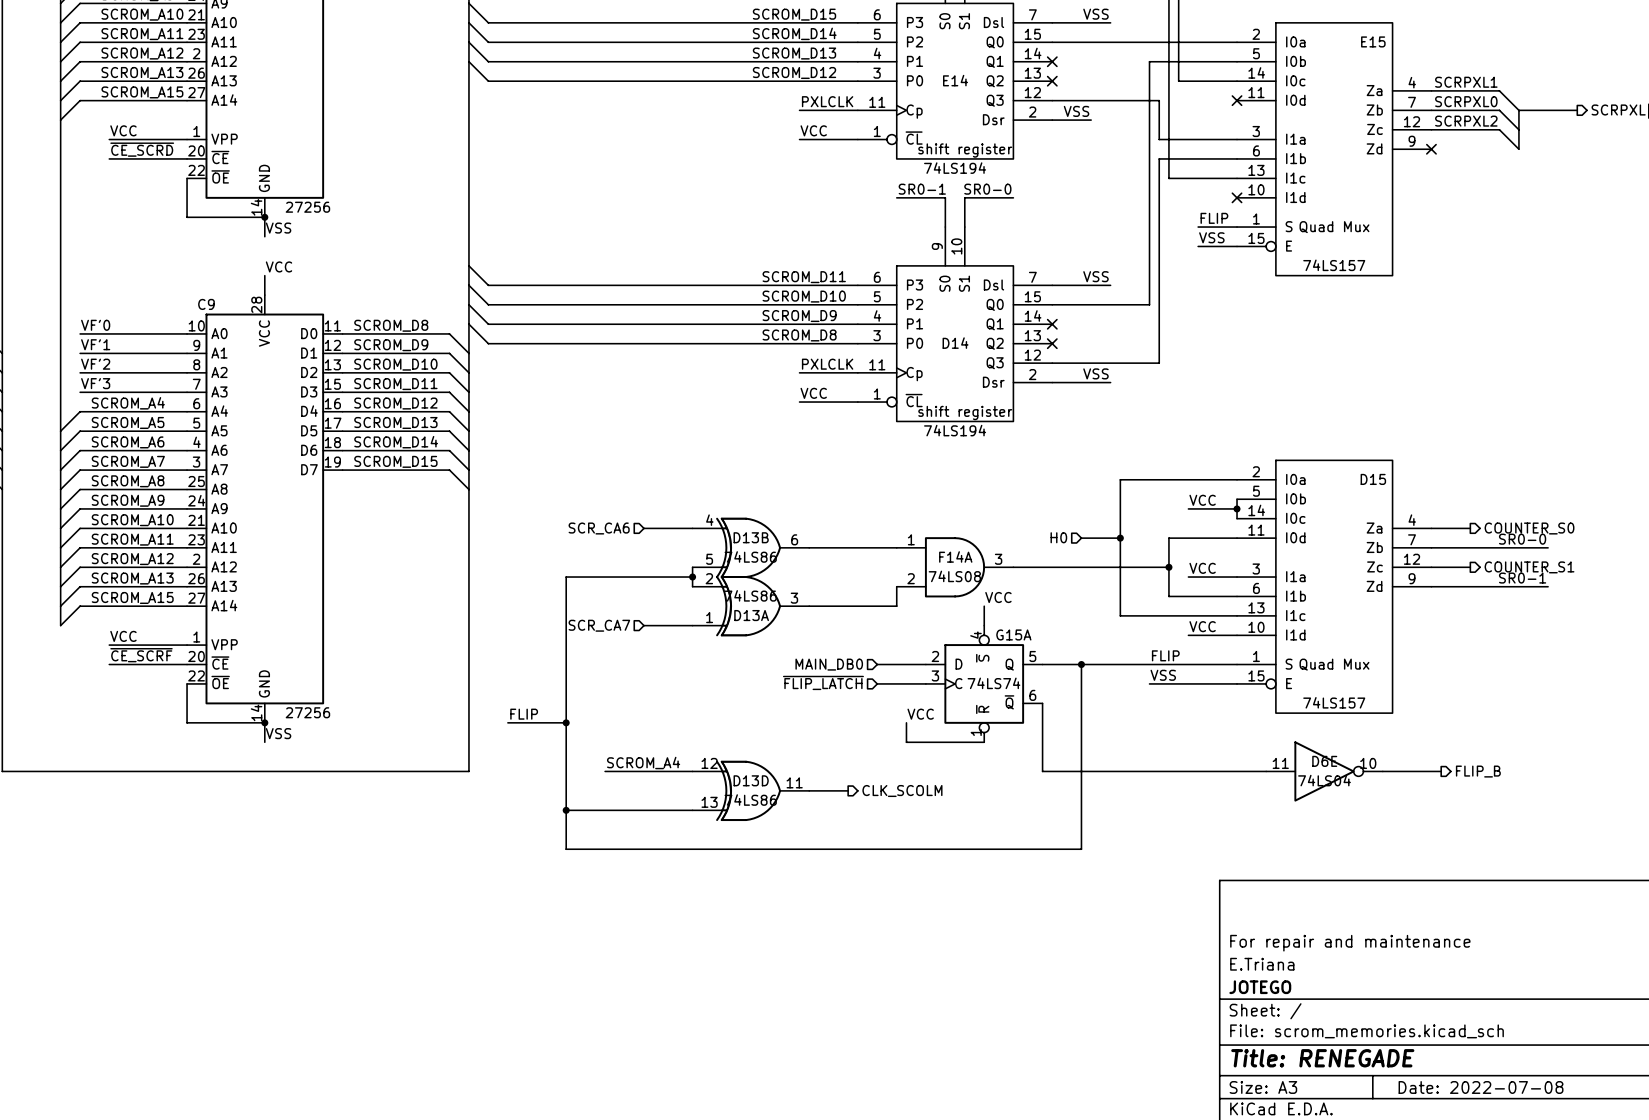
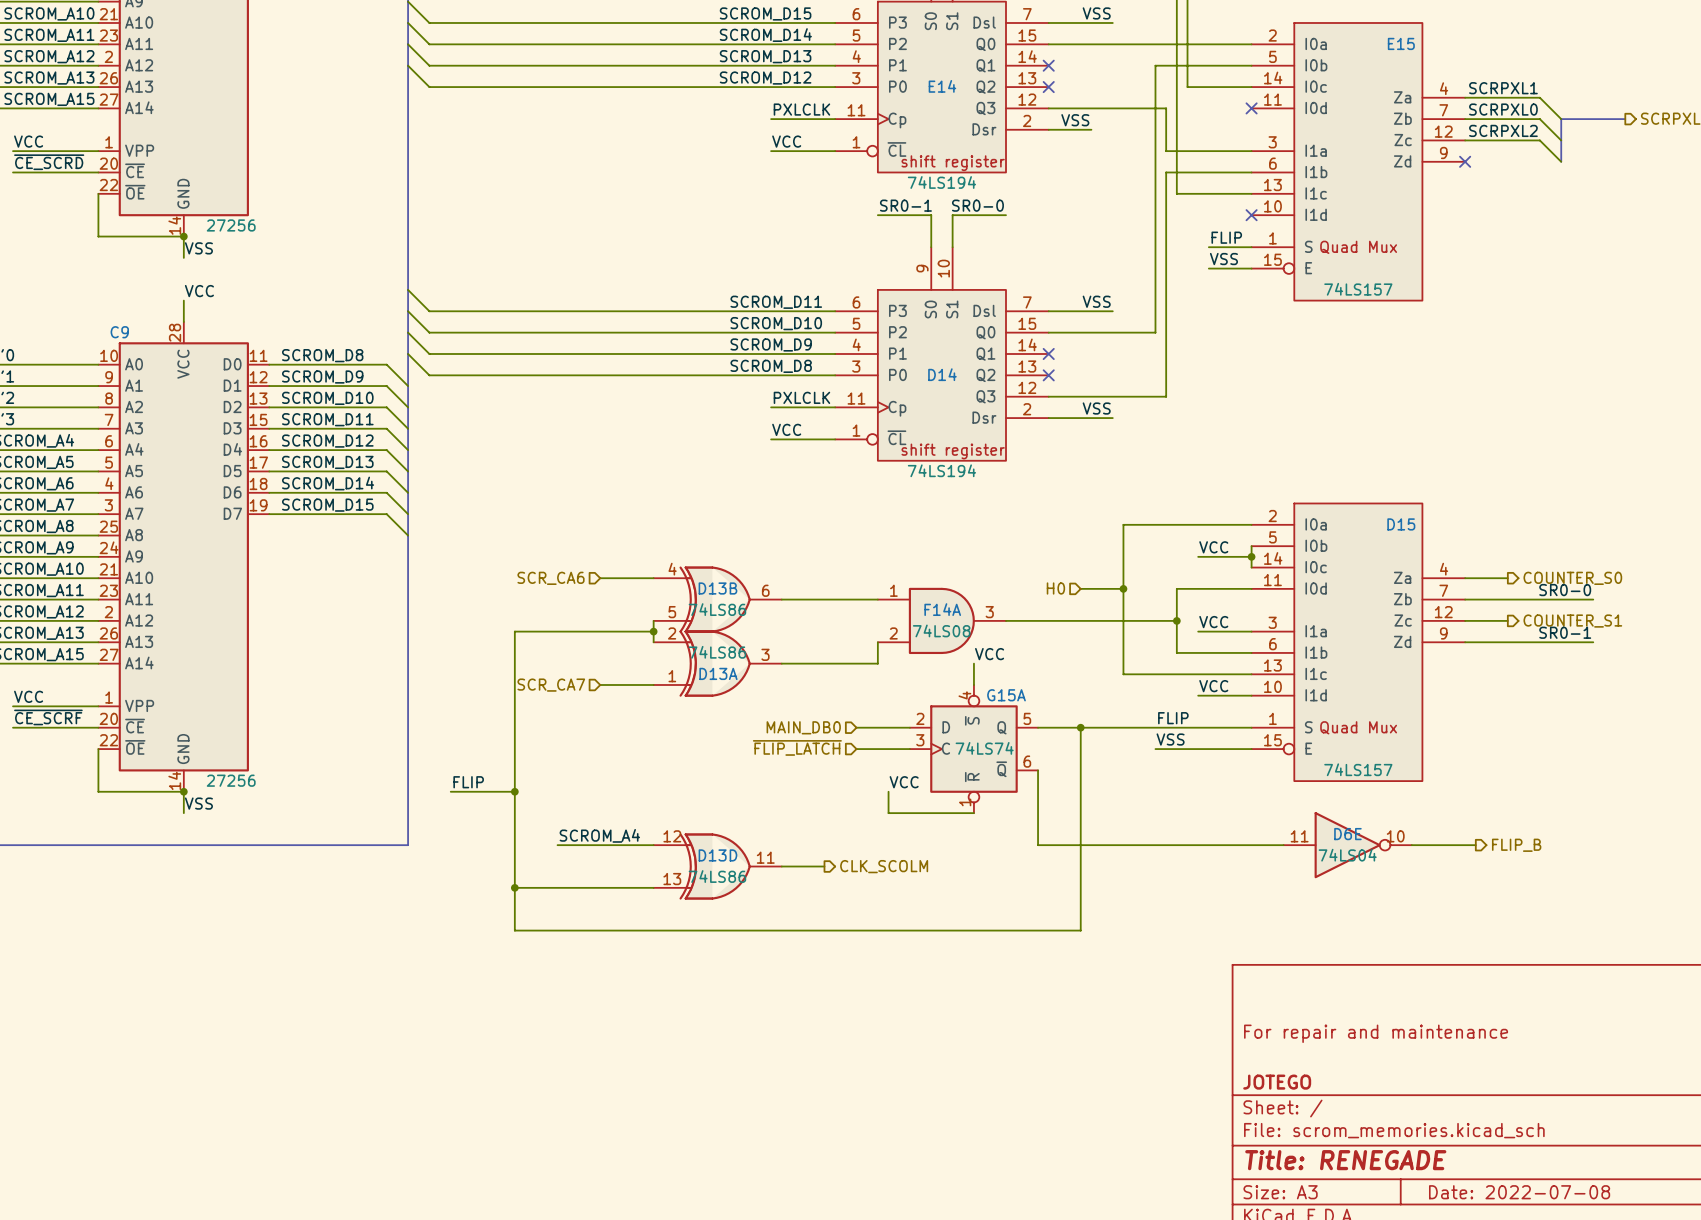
title block: E.Triana (1262, 964) -> none

